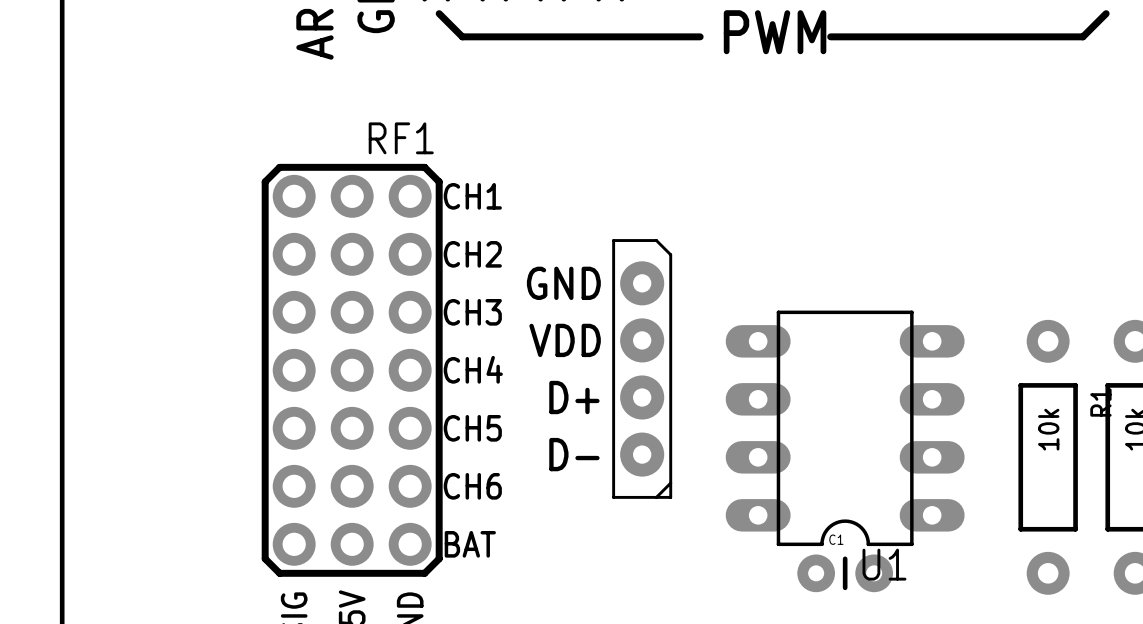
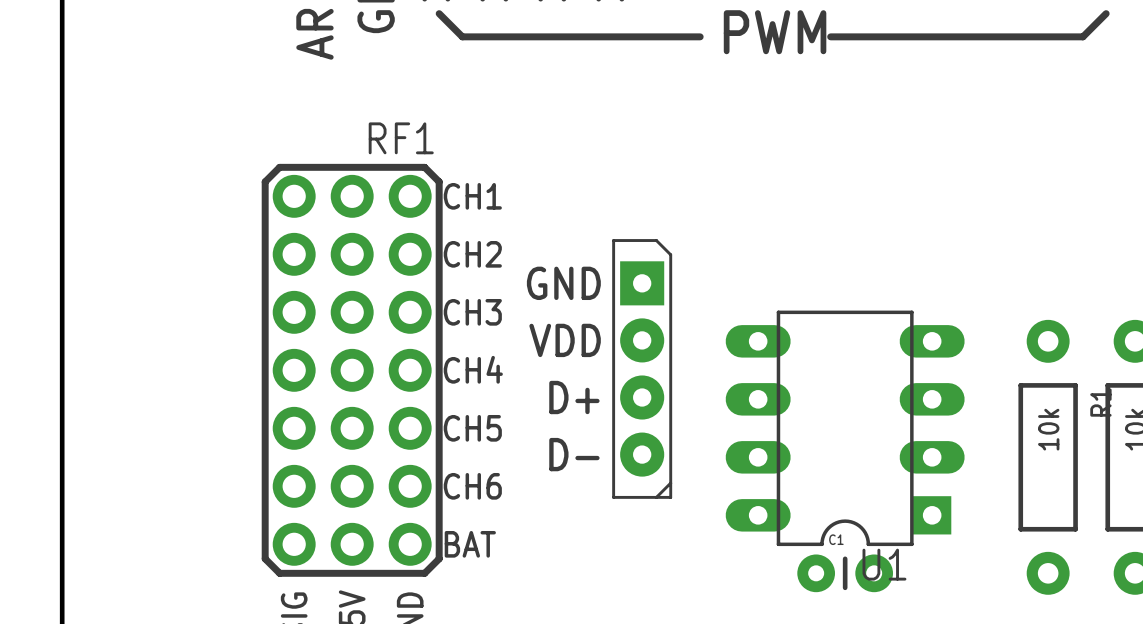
part footprint: [612, 239, 673, 499] -> [612, 239, 673, 499]
U1 footprint: [725, 310, 965, 547] -> [725, 310, 965, 547]

